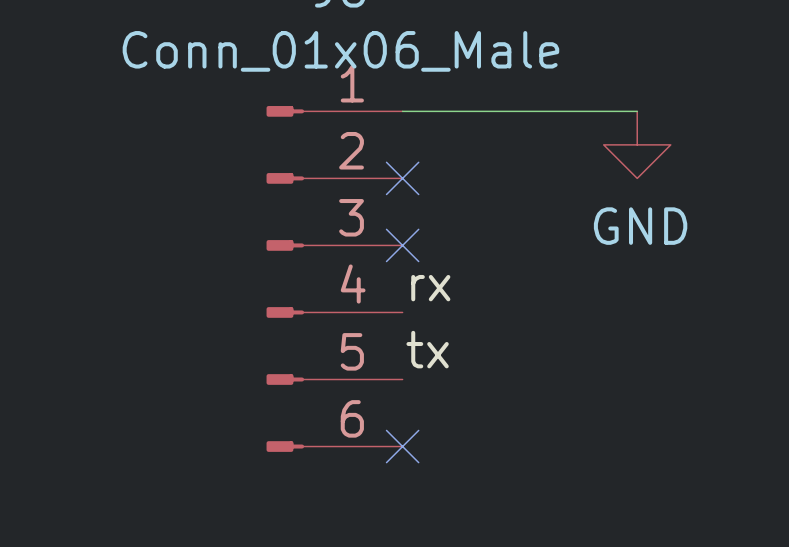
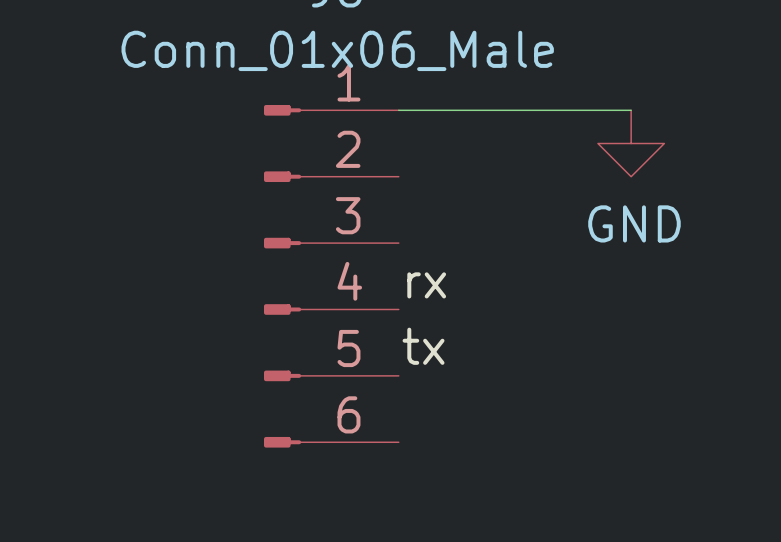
no-connect mark: (402, 178) -> none
no-connect mark: (402, 245) -> none
no-connect mark: (402, 446) -> none

